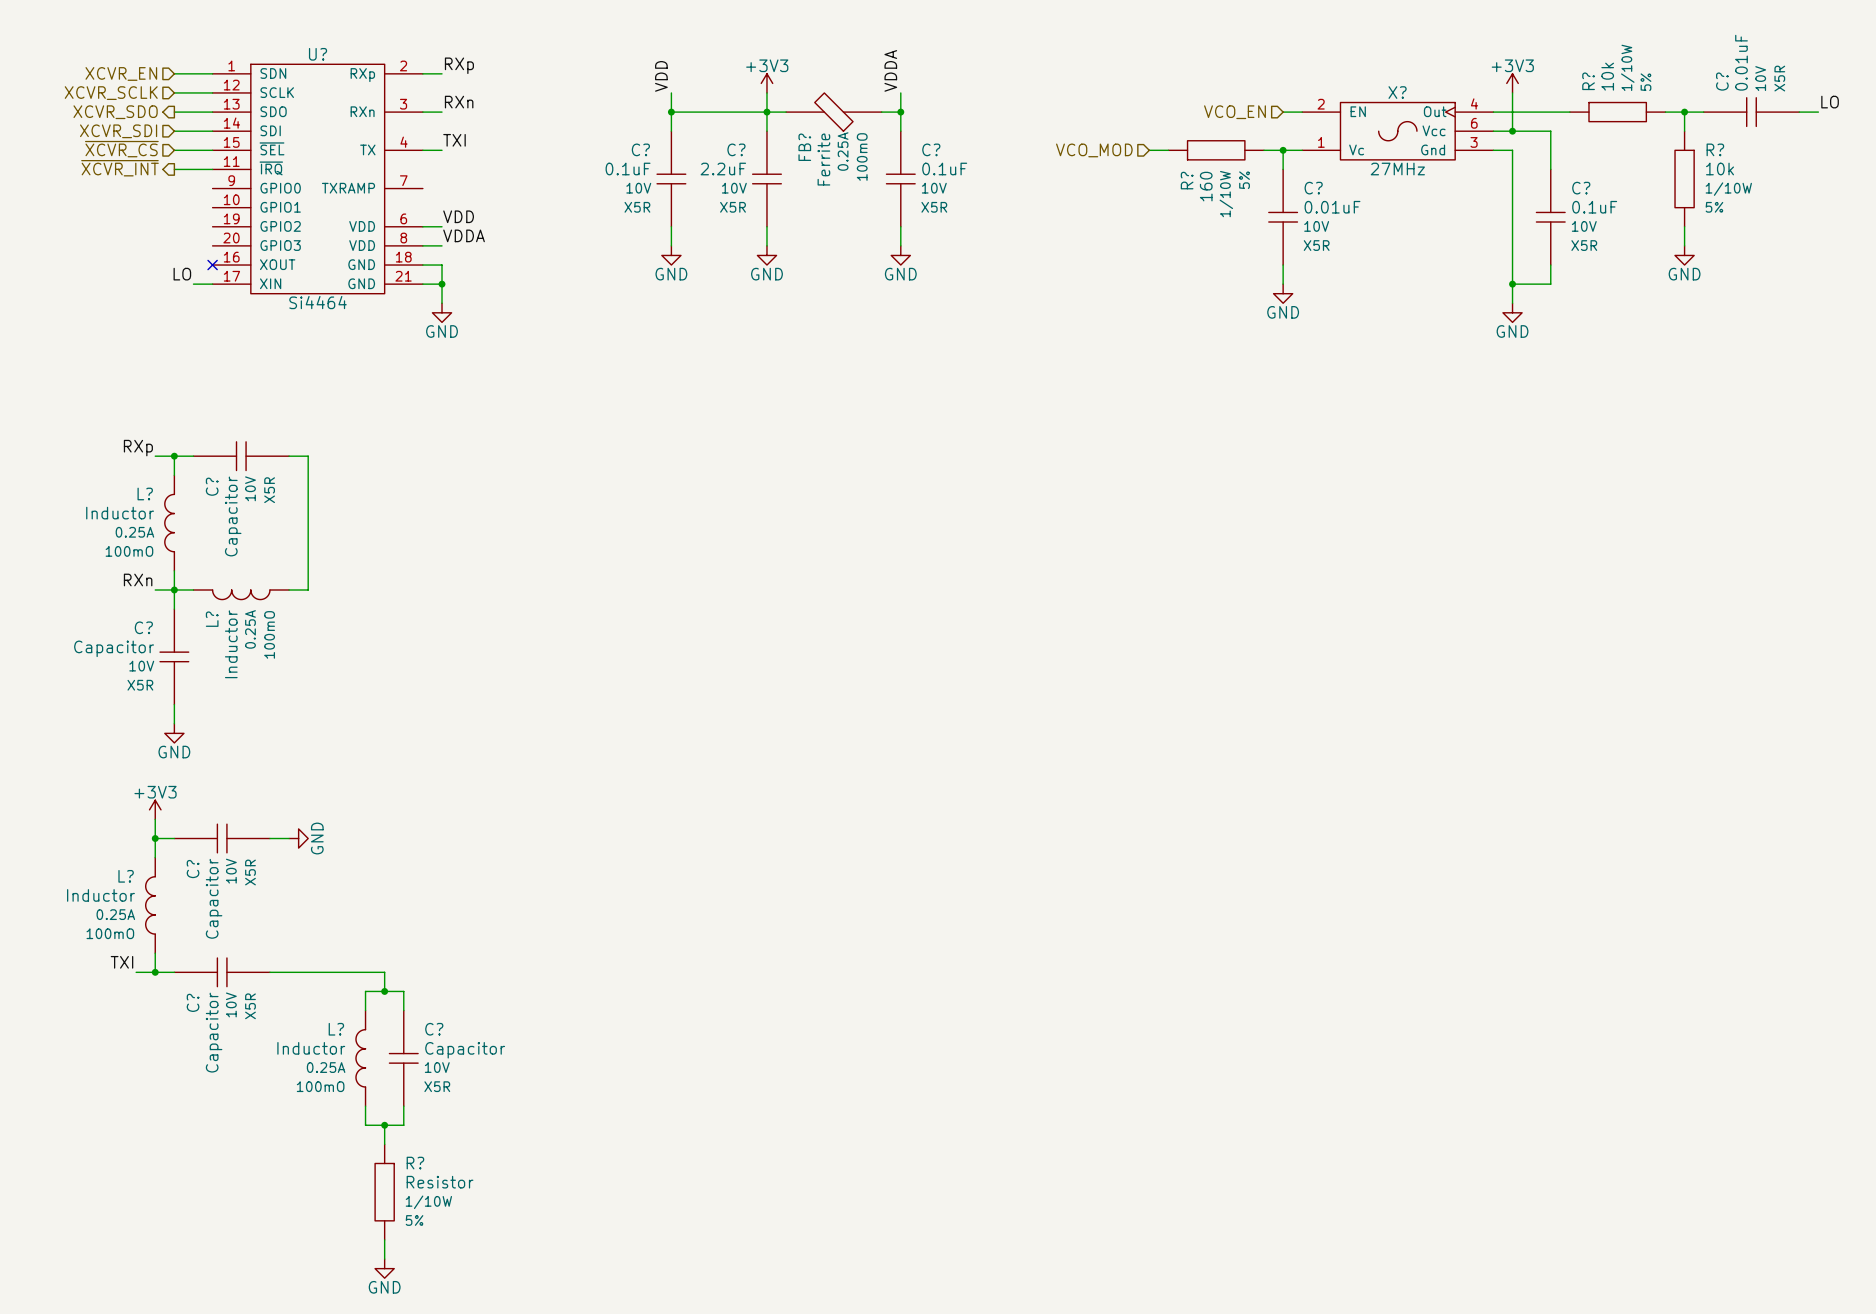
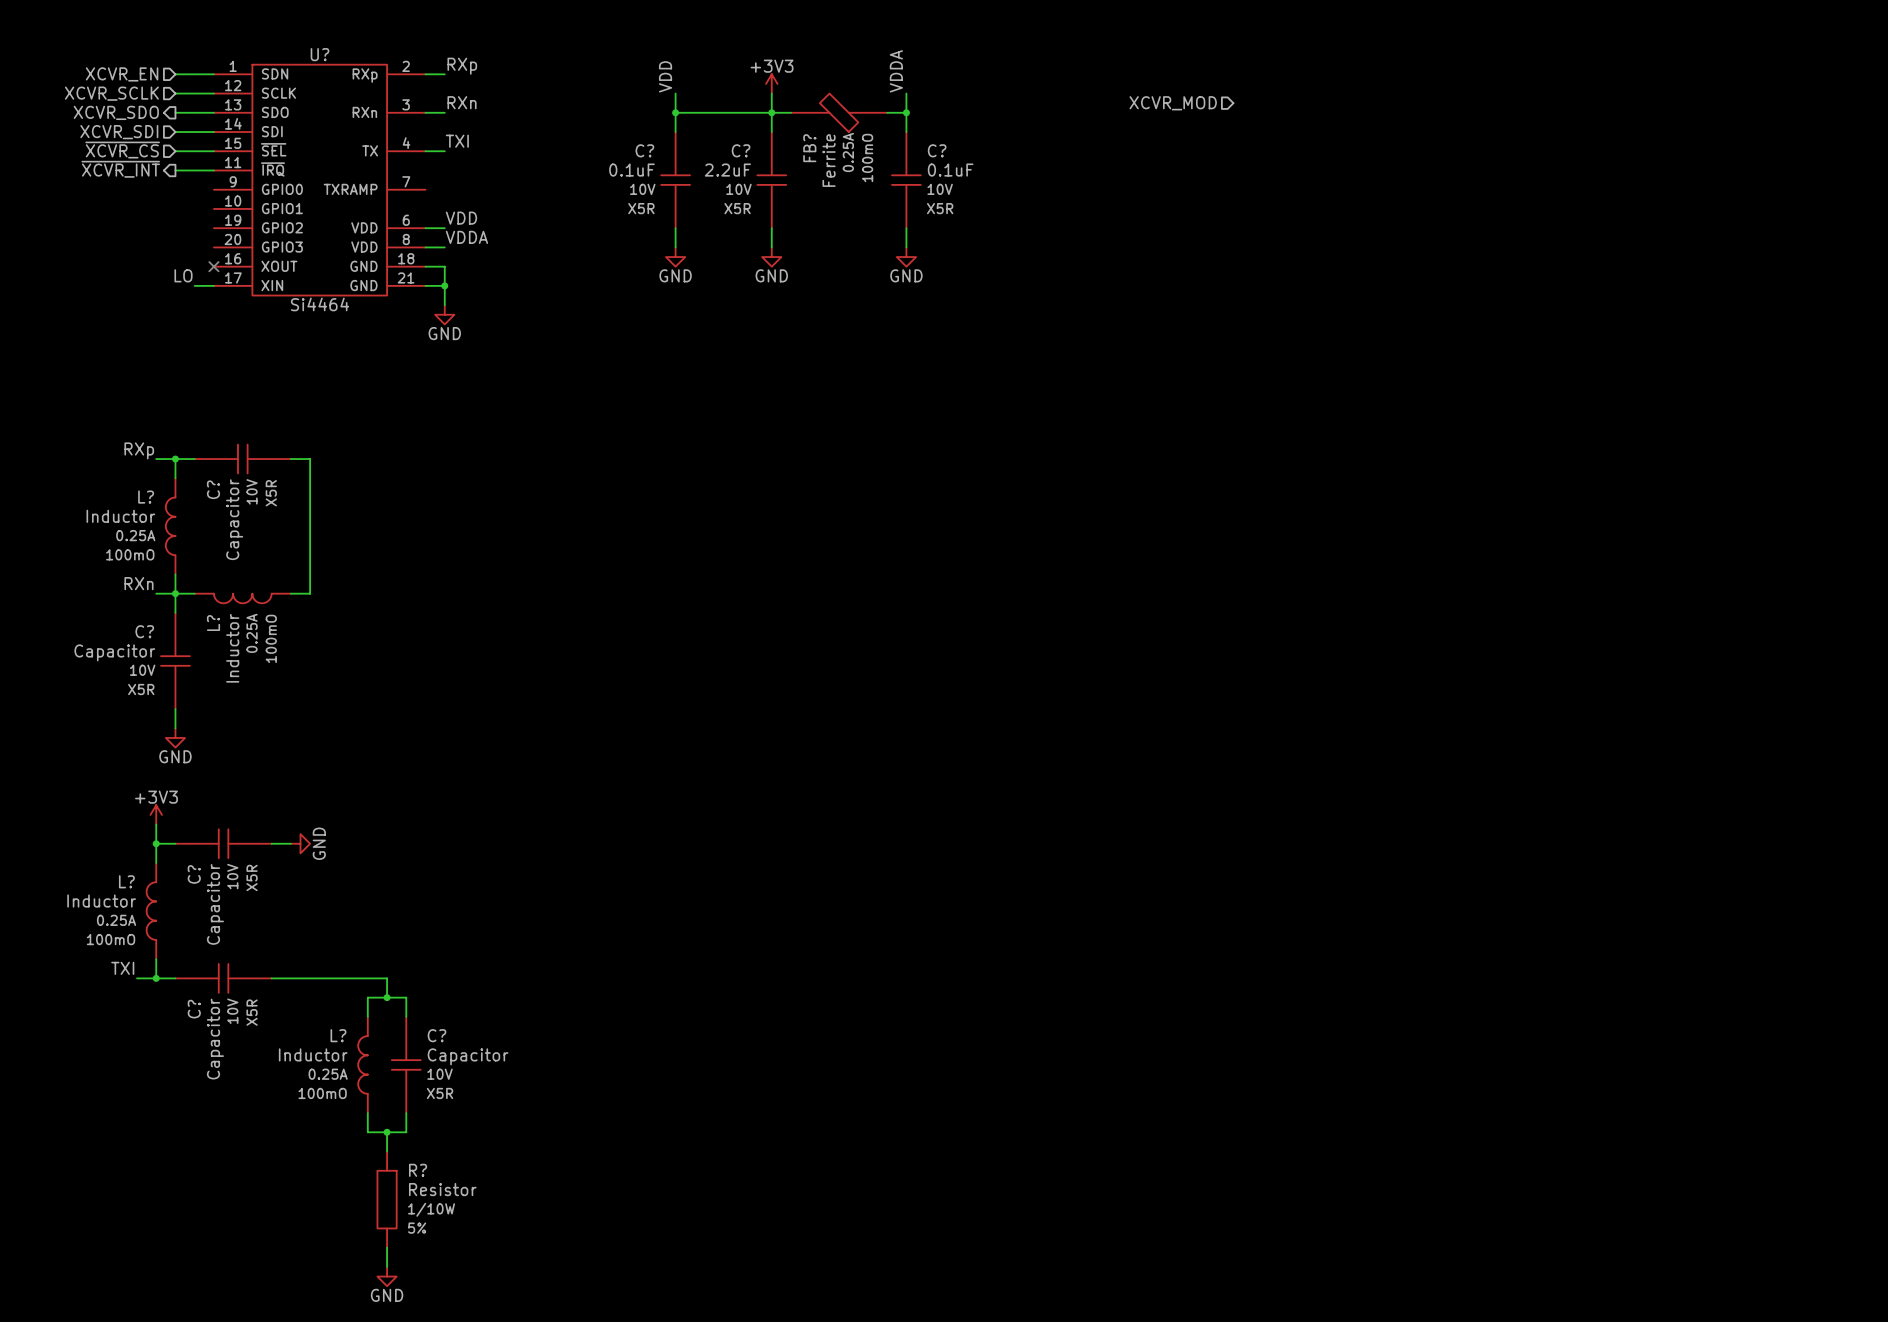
power symbol: +3V3 (1512, 83) -> none
wire: (1512, 92) (1512, 131) -> none
hierarchical label: none -> XCVR_MOD (1173, 103)
label: LO (1830, 102) -> none
hierarchical label: VCO_EN (1234, 112) -> none
wire: (1283, 112) (1302, 112) -> none
wire: (1493, 112) (1569, 112) -> none
R?: 10k (1617, 112) -> none
wire: (1665, 112) (1703, 112) -> none
wire: (1684, 112) (1684, 131) -> none
junction: (1684, 112) -> none
C?: 0.01uF (1751, 112) -> none
wire: (1799, 112) (1818, 112) -> none
X?: 27MHz (1397, 131) -> none
wire: (1493, 131) (1550, 131) (1550, 169) -> none
junction: (1512, 131) -> none
hierarchical label: VCO_MOD (1094, 150) -> none
wire: (1149, 150) (1168, 150) -> none
R?: 160 (1216, 150) -> none
wire: (1264, 150) (1302, 150) -> none
wire: (1283, 150) (1283, 169) -> none
junction: (1283, 150) -> none
wire: (1493, 150) (1512, 150) (1512, 303) -> none
R?: 10k (1684, 178) -> none
C?: 0.01uF (1283, 217) -> none
C?: 0.1uF (1550, 217) -> none
wire: (1684, 226) (1684, 245) -> none
power symbol: GND (1684, 255) -> none
wire: (1283, 265) (1283, 284) -> none
wire: (1550, 265) (1550, 284) (1512, 284) -> none
junction: (1512, 284) -> none
power symbol: GND (1283, 293) -> none
power symbol: GND (1512, 312) -> none

